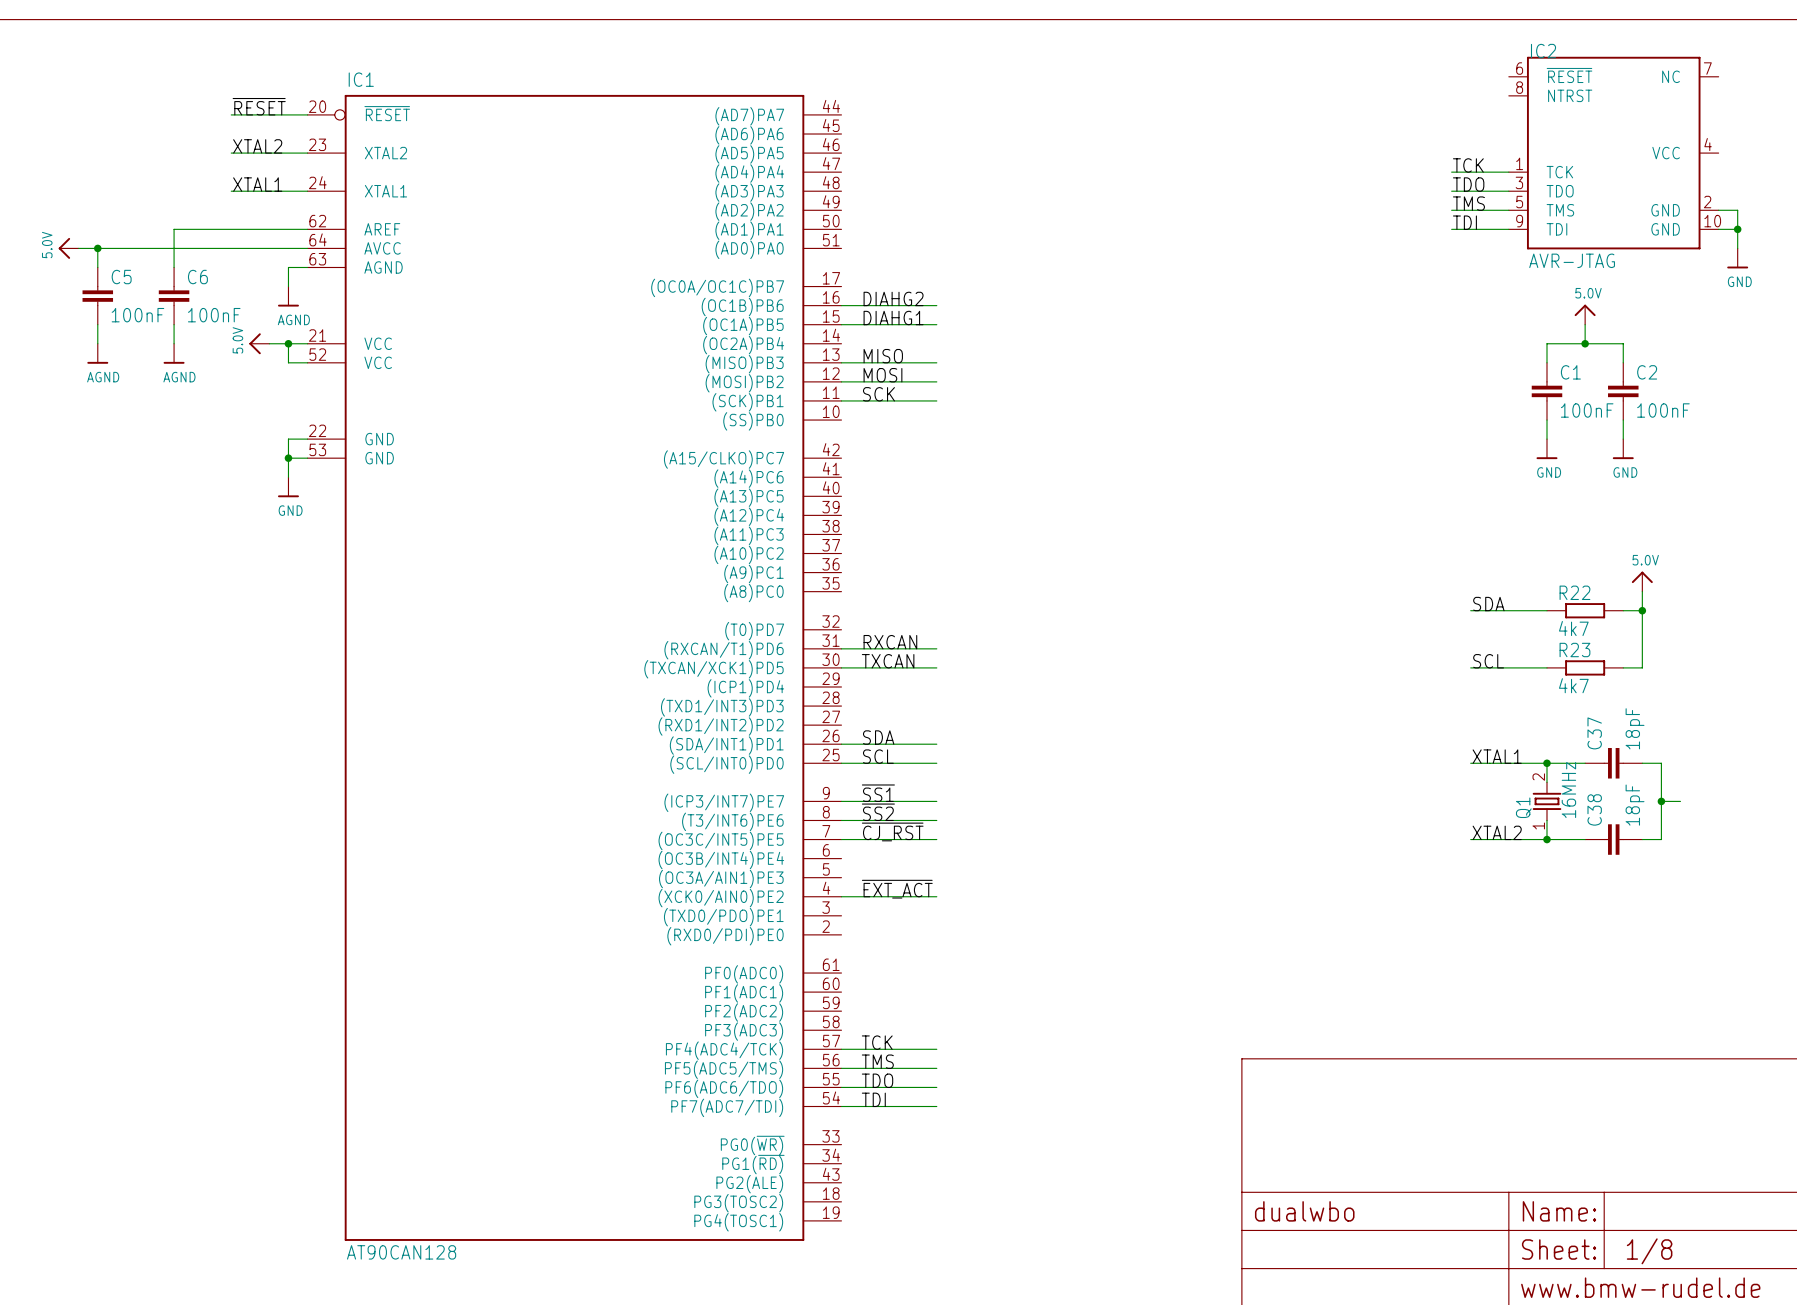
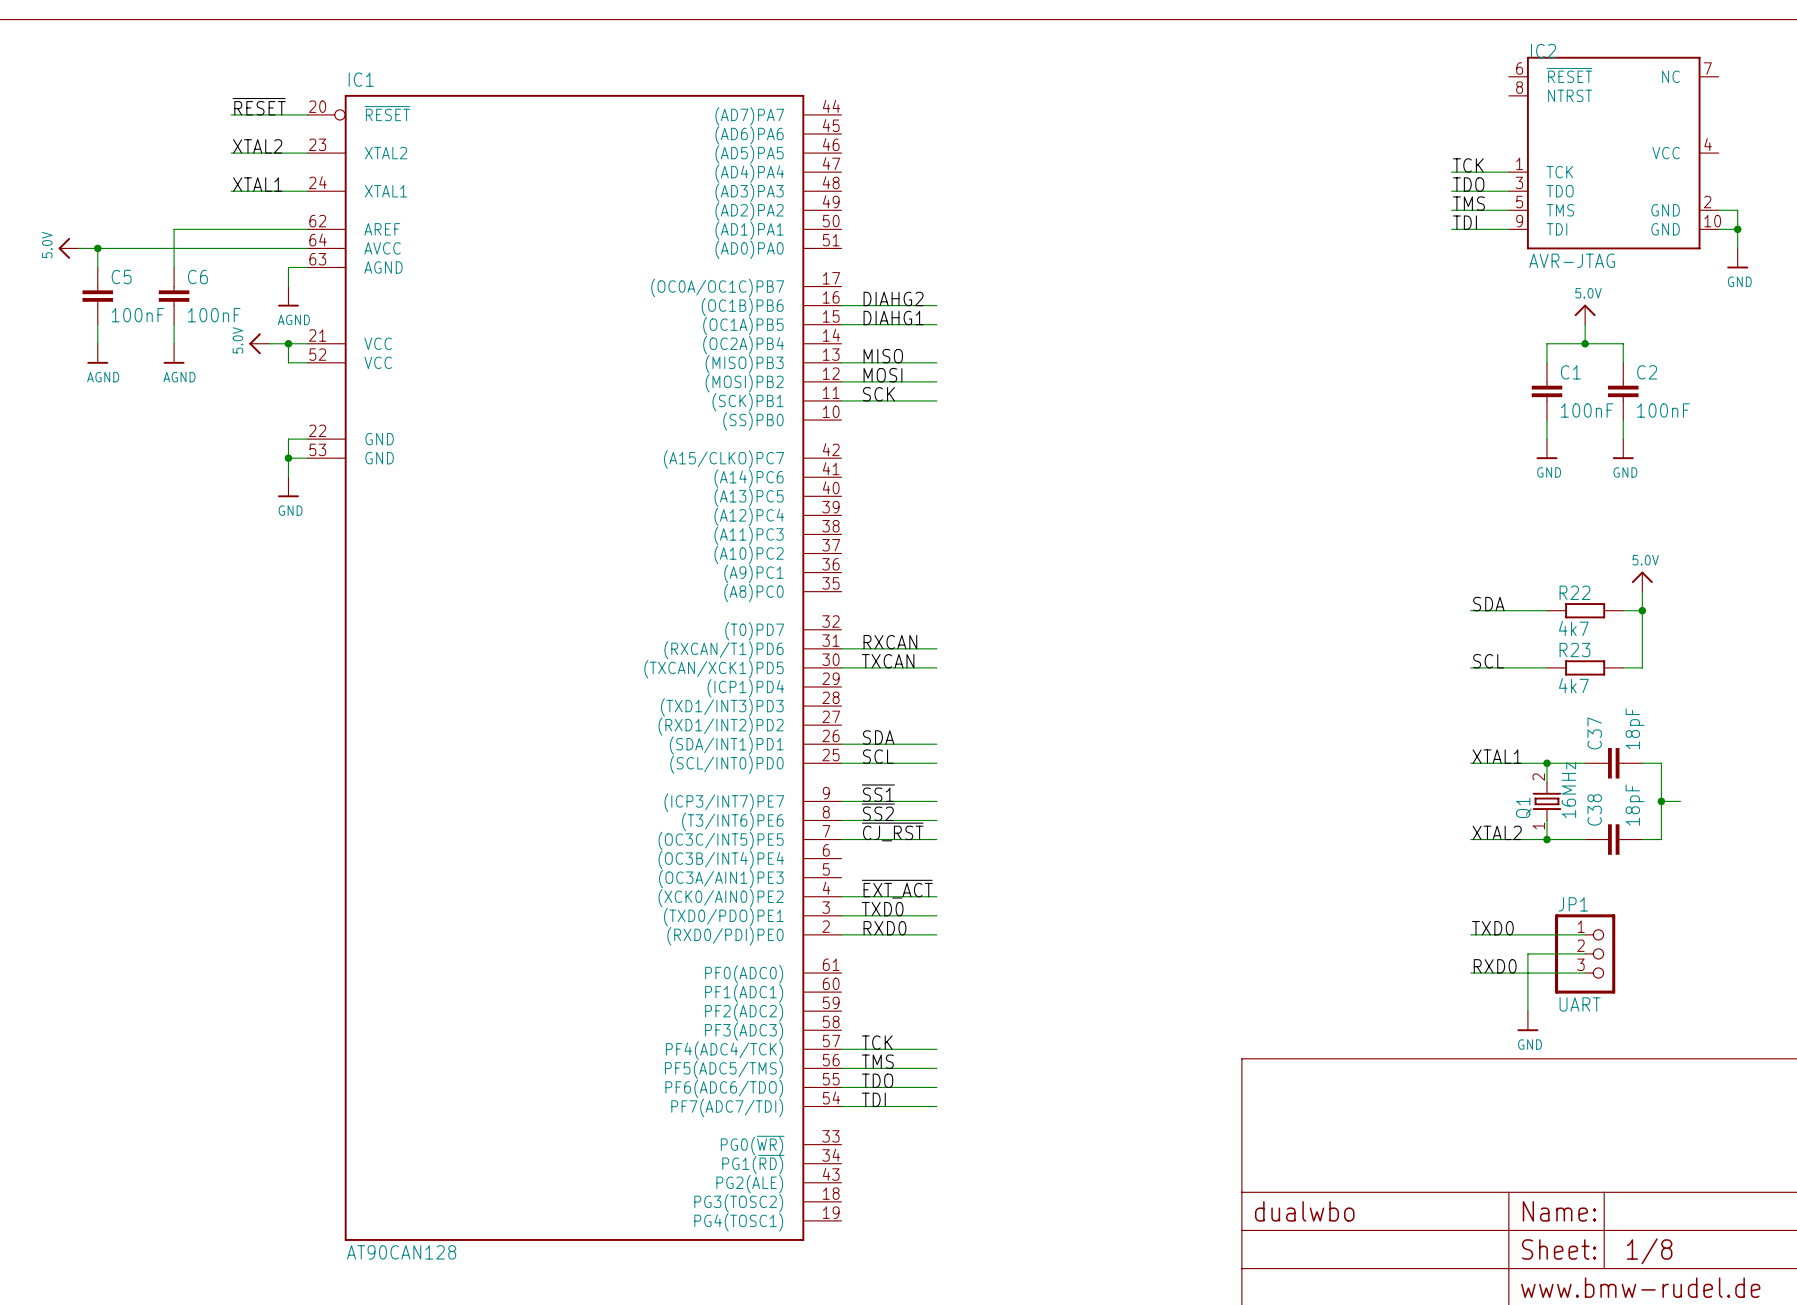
label: none -> TXD0 (882, 909)
wire: none -> (841, 915) (936, 915)
label: none -> RXD0 (884, 928)
label: none -> TXD0 (1492, 928)
wire: none -> (841, 934) (936, 934)
wire: none -> (1470, 934) (1585, 934)
wire: none -> (1585, 953) (1527, 953) (1527, 1011)
JP1: none -> UART (1585, 953)
label: none -> RXD0 (1495, 966)
wire: none -> (1470, 973) (1585, 973)
power symbol: none -> GND (1527, 1021)

